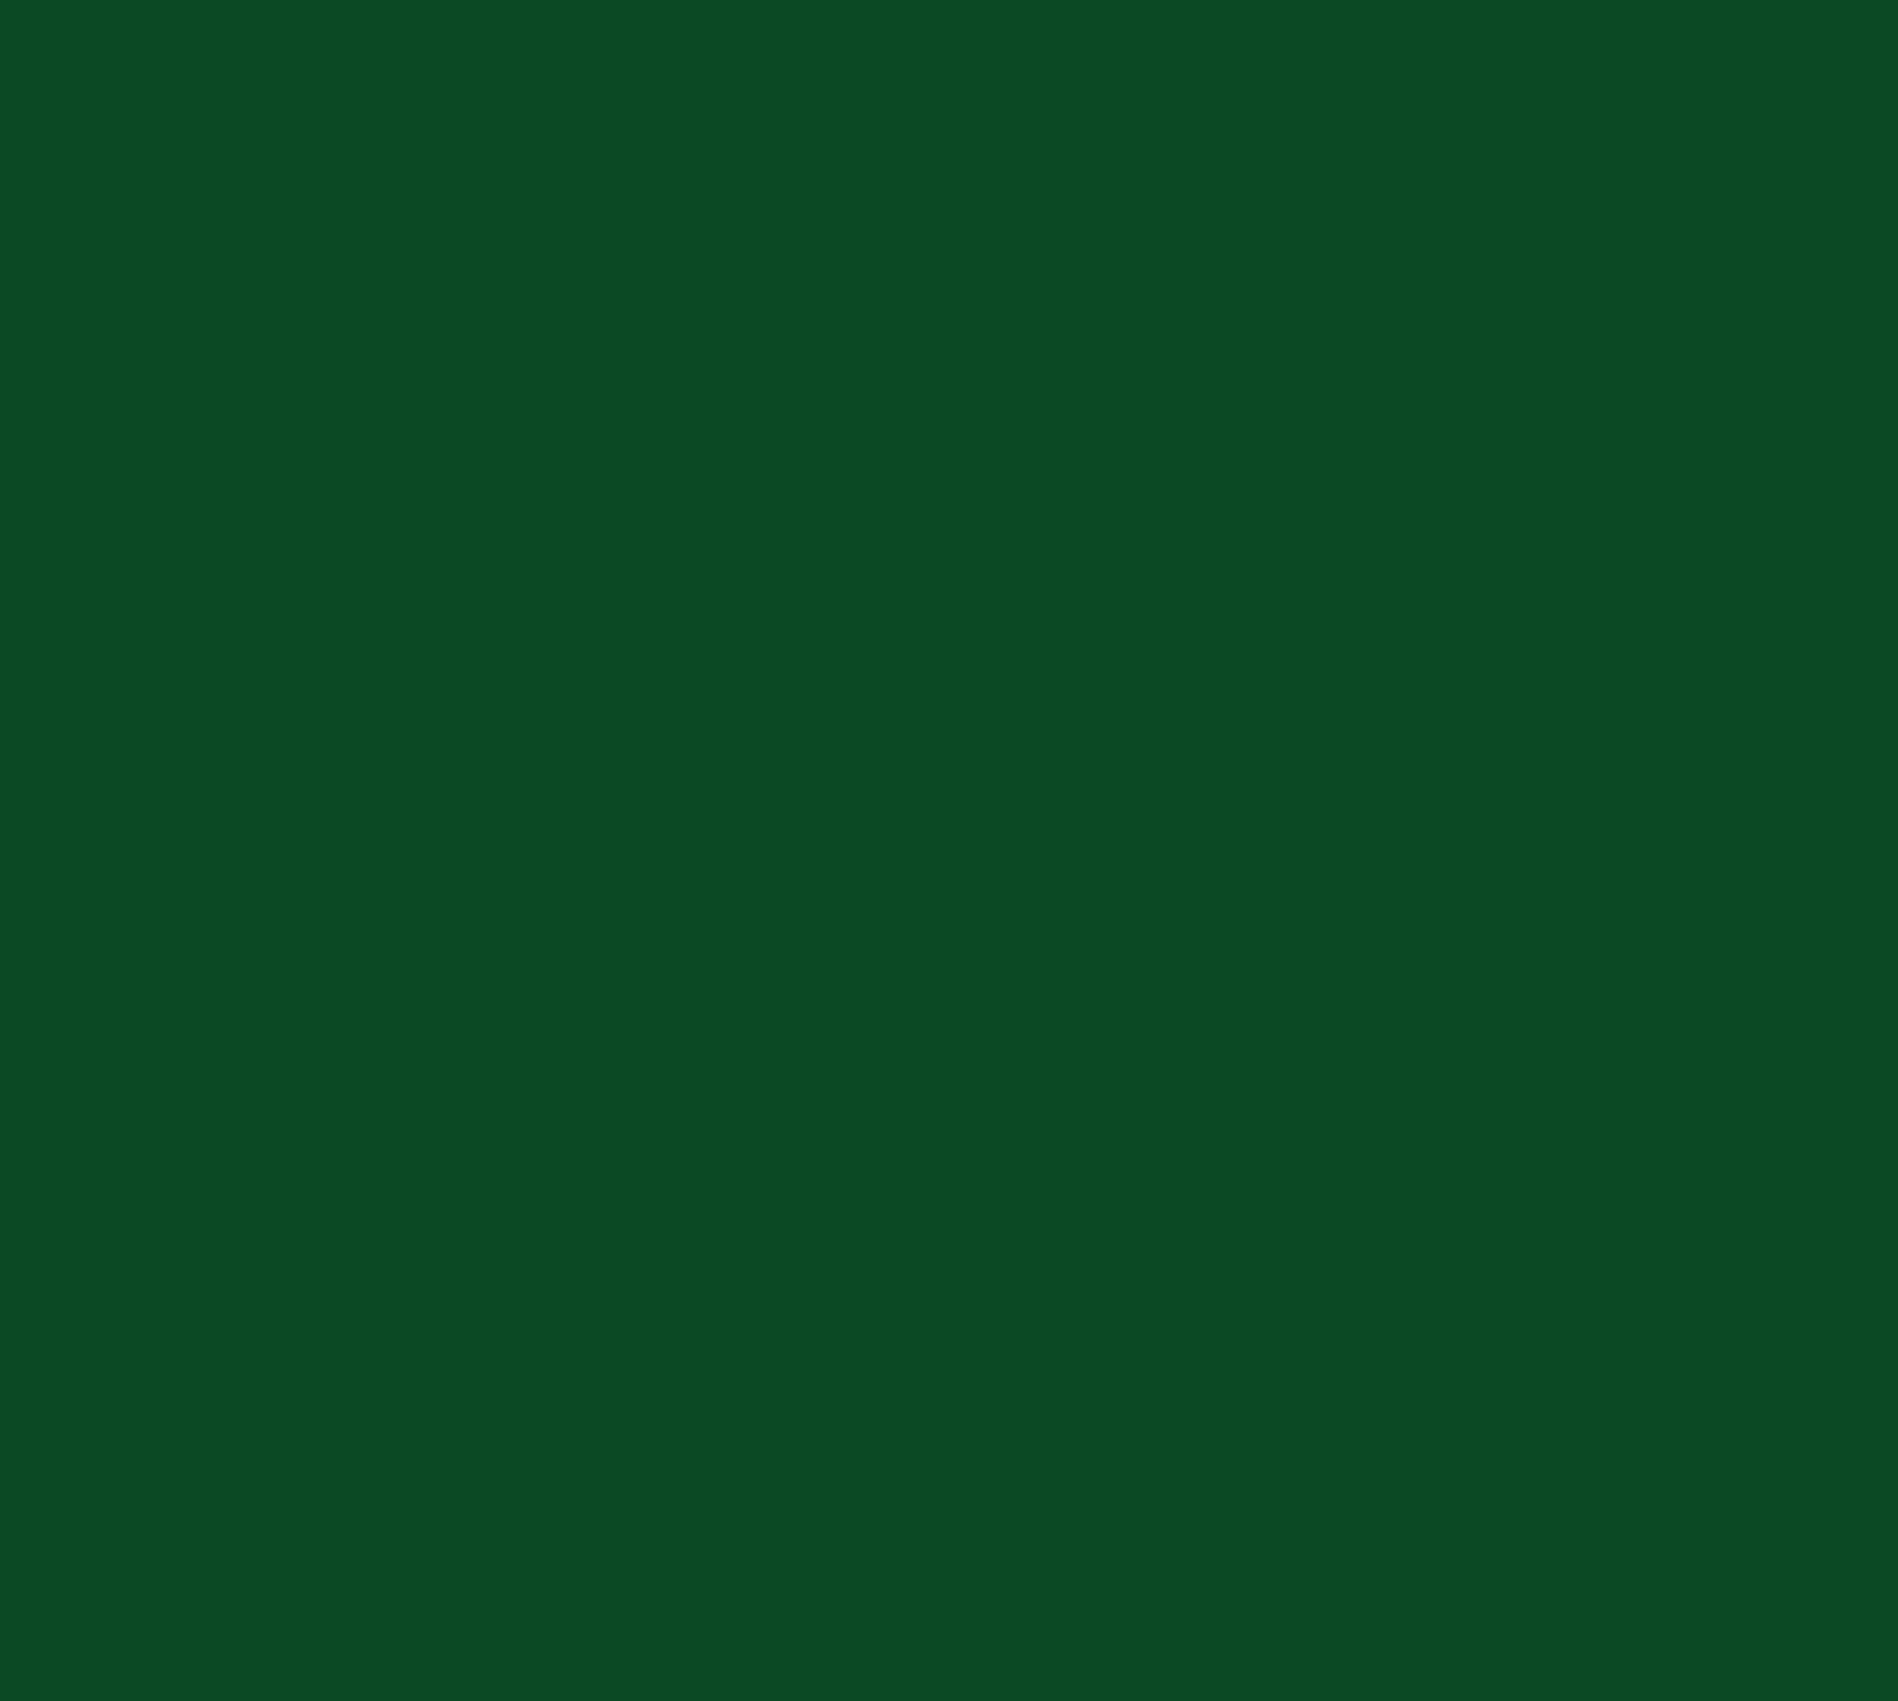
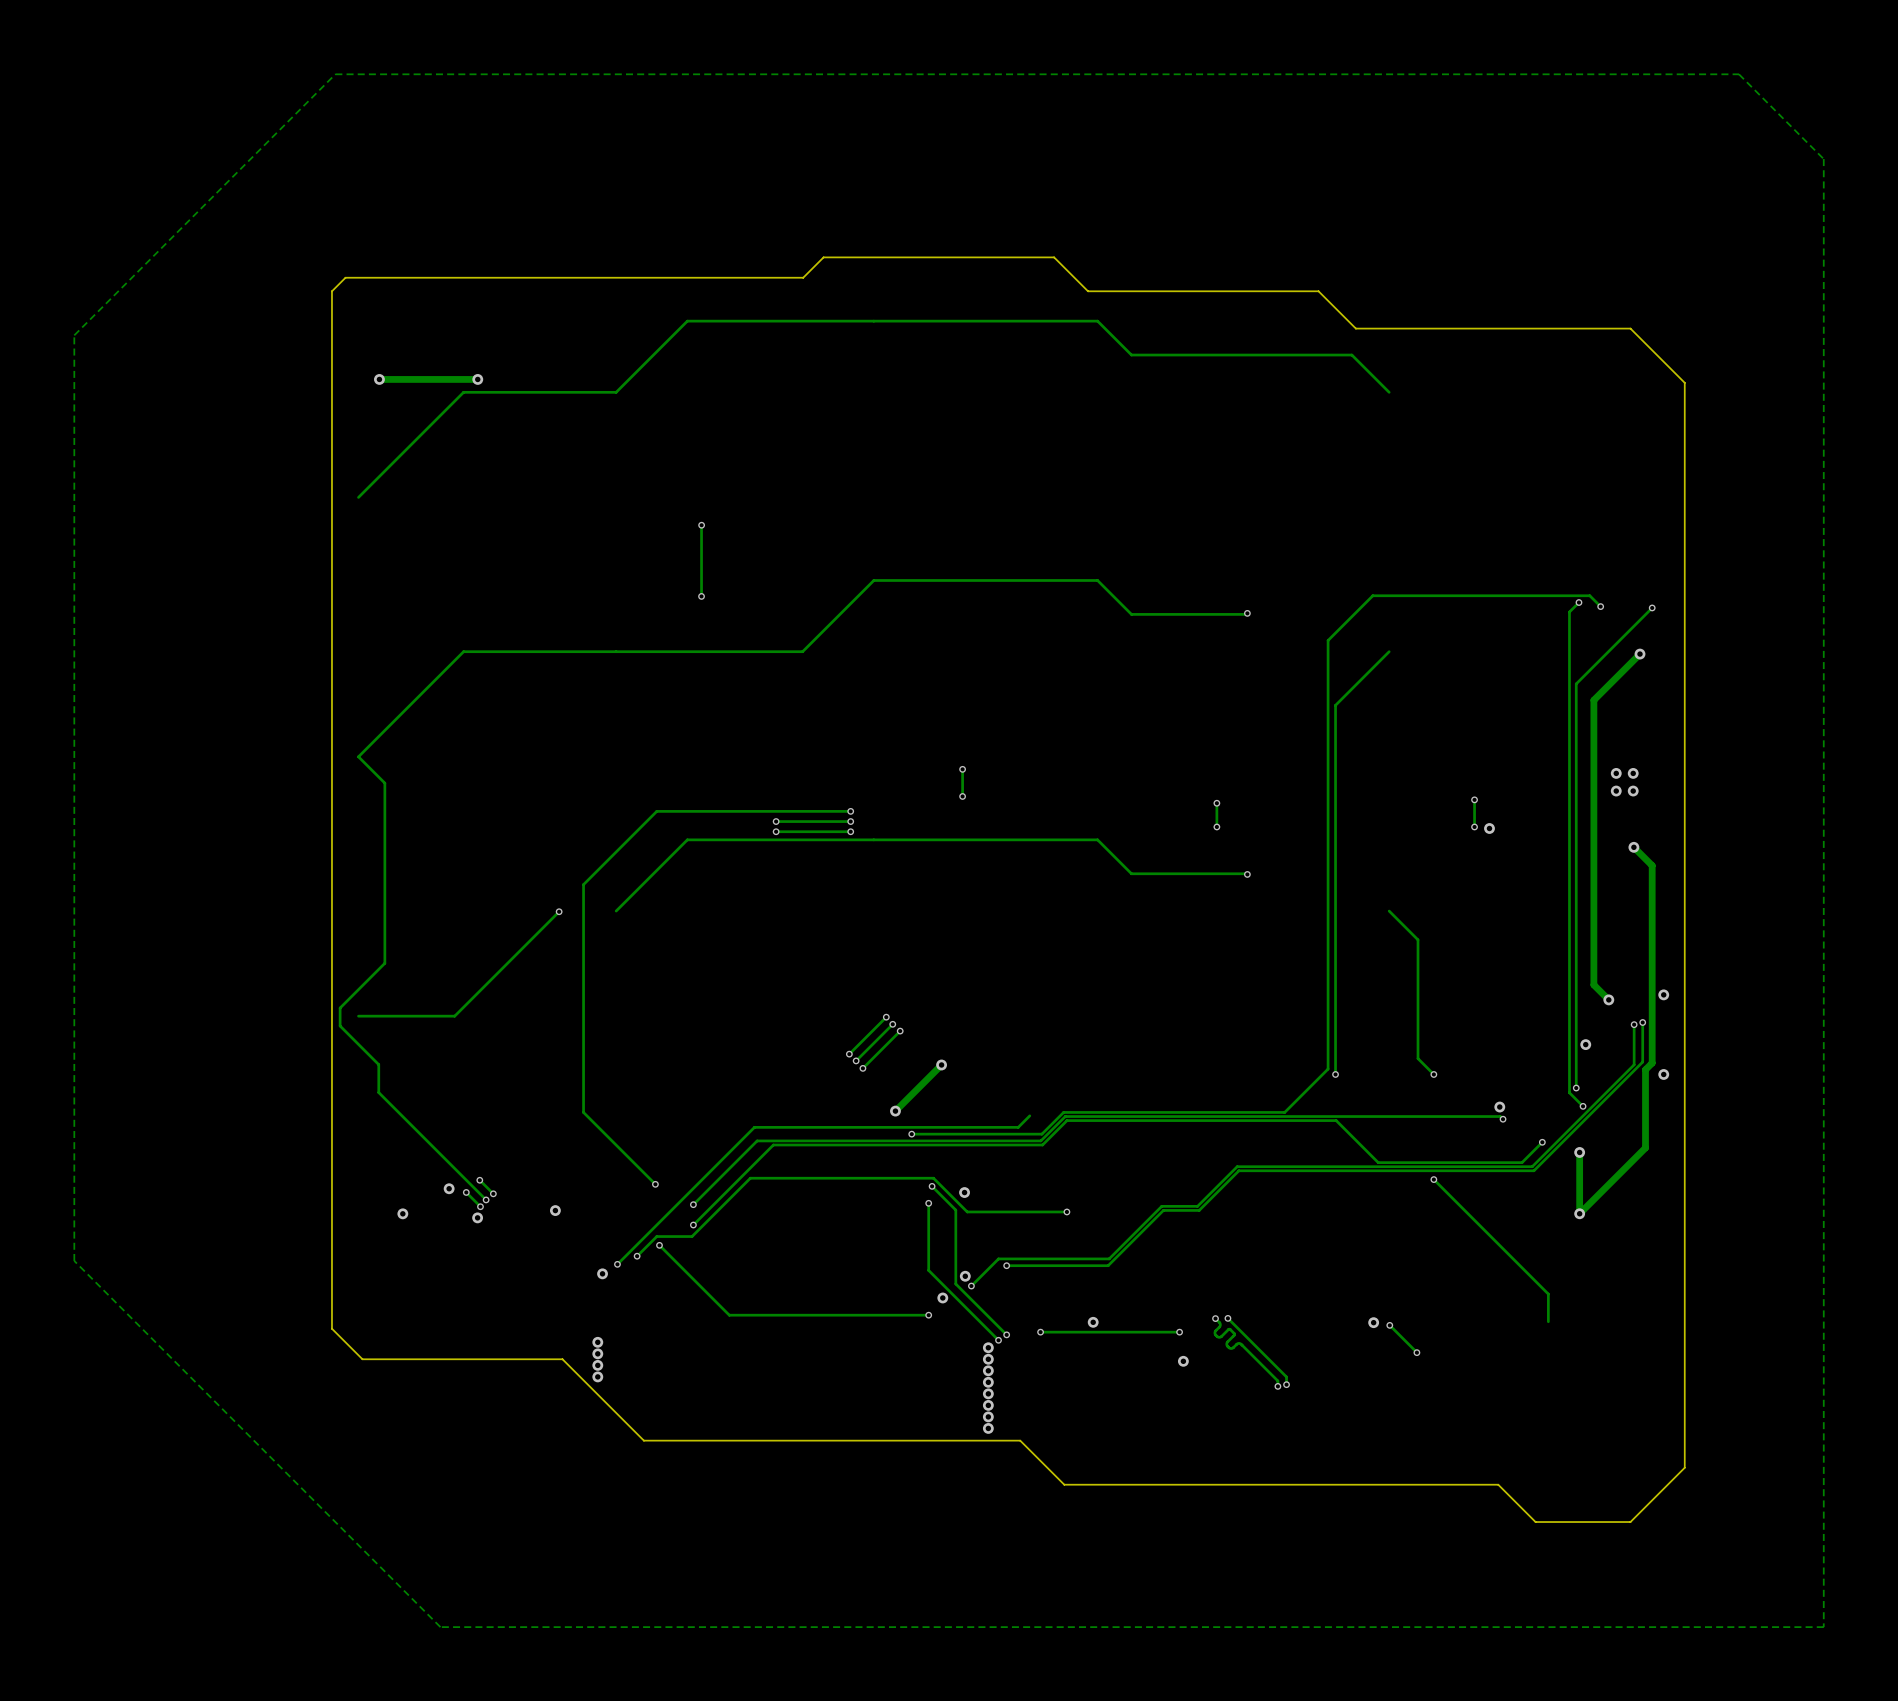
zone outline: none -> (1739, 74) (335, 74) (74, 335) (74, 1260) (440, 1627) (1823, 1627) (1823, 159) (1739, 74)
board edge: none -> (1054, 257) (1088, 291) (1318, 291) (1355, 328) (1630, 328) (1684, 382) (1684, 1467) (1630, 1522) (1535, 1522) (1498, 1484) (1064, 1484) (1020, 1440) (643, 1440) (562, 1359) (362, 1359) (331, 1328) (331, 291) (345, 277) (803, 277) (823, 257) (1054, 257)
via: none -> (379, 379)
track: none -> (477, 379) (379, 379)
via: none -> (477, 379)
track: none -> (1389, 392) (1351, 355) (1131, 355) (1097, 321) (687, 321) (616, 392) (463, 392) (358, 497)
track: none -> (701, 525) (701, 596)
via: none -> (701, 525)
via: none -> (701, 596)
track: none -> (1578, 602) (1569, 612) (1569, 1092) (1583, 1106)
via: none -> (1578, 602)
track: none -> (1600, 606) (1589, 595) (1372, 595) (1328, 640) (1328, 1069) (1284, 1112) (1063, 1112) (1041, 1134) (911, 1134)
via: none -> (1600, 606)
track: none -> (1652, 607) (1576, 683) (1576, 1088)
via: none -> (1652, 607)
track: none -> (1247, 613) (1131, 614) (1097, 580) (873, 580) (802, 651) (463, 651) (358, 756) (384, 783) (384, 963) (340, 1008) (340, 1025) (378, 1064) (378, 1092) (486, 1199)
via: none -> (1247, 613)
track: none -> (1389, 651) (1335, 705) (1335, 1074)
track: none -> (1640, 654) (1593, 700) (1593, 984) (1608, 999)
via: none -> (1640, 654)
track: none -> (962, 769) (962, 796)
via: none -> (962, 769)
via: none -> (1616, 773)
via: none -> (1633, 773)
via: none -> (1616, 791)
via: none -> (1633, 791)
via: none -> (962, 796)
track: none -> (1474, 799) (1474, 826)
via: none -> (1474, 799)
track: none -> (1216, 803) (1216, 826)
via: none -> (1216, 803)
track: none -> (850, 811) (656, 811) (583, 884) (583, 1112) (655, 1184)
via: none -> (850, 811)
via: none -> (776, 821)
track: none -> (850, 821) (776, 821)
via: none -> (850, 821)
via: none -> (1216, 826)
via: none -> (1474, 826)
via: none -> (1489, 828)
via: none -> (776, 831)
track: none -> (850, 831) (776, 831)
via: none -> (850, 831)
track: none -> (1633, 847) (1652, 865) (1652, 1063) (1645, 1069) (1645, 1147) (1579, 1213) (1579, 1152)
via: none -> (1633, 847)
track: none -> (1247, 874) (1131, 873) (1097, 839) (687, 839) (616, 911)
via: none -> (1247, 874)
track: none -> (559, 911) (454, 1016) (358, 1016)
via: none -> (559, 911)
track: none -> (1389, 911) (1418, 939) (1418, 1058) (1433, 1074)
via: none -> (1663, 994)
via: none -> (1608, 999)
track: none -> (886, 1017) (849, 1054)
via: none -> (886, 1017)
track: none -> (1642, 1022) (1642, 1062) (1533, 1170) (1238, 1170) (1199, 1210) (1163, 1210) (1108, 1265) (1006, 1265)
via: none -> (1642, 1022)
track: none -> (892, 1024) (856, 1060)
via: none -> (892, 1024)
track: none -> (1634, 1024) (1634, 1064) (1532, 1166) (1237, 1166) (1197, 1206) (1161, 1206) (1109, 1258) (998, 1258) (971, 1286)
via: none -> (1634, 1024)
track: none -> (900, 1031) (862, 1068)
via: none -> (900, 1031)
via: none -> (1585, 1044)
via: none -> (849, 1054)
via: none -> (856, 1060)
track: none -> (941, 1064) (895, 1111)
via: none -> (941, 1064)
via: none -> (862, 1068)
via: none -> (1335, 1074)
via: none -> (1433, 1074)
via: none -> (1663, 1074)
via: none -> (1576, 1088)
via: none -> (1583, 1106)
via: none -> (1499, 1107)
via: none -> (895, 1111)
track: none -> (1029, 1115) (1018, 1127) (754, 1127) (617, 1264)
track: none -> (1503, 1119) (1500, 1116) (1065, 1116) (1040, 1140) (757, 1140) (693, 1204)
via: none -> (1503, 1119)
via: none -> (911, 1134)
track: none -> (1542, 1142) (1522, 1162) (1378, 1162) (1336, 1120) (1067, 1120) (1042, 1145) (773, 1145) (693, 1225)
via: none -> (1542, 1142)
via: none -> (1579, 1152)
track: none -> (1433, 1179) (1548, 1294) (1548, 1321)
via: none -> (1433, 1179)
track: none -> (479, 1180) (493, 1193)
via: none -> (479, 1180)
via: none -> (655, 1184)
track: none -> (932, 1186) (955, 1210) (955, 1284) (1006, 1334)
via: none -> (932, 1186)
via: none -> (449, 1188)
track: none -> (466, 1192) (480, 1206)
via: none -> (466, 1192)
via: none -> (964, 1192)
via: none -> (493, 1193)
via: none -> (486, 1199)
track: none -> (928, 1203) (928, 1270) (998, 1340)
via: none -> (928, 1203)
via: none -> (693, 1204)
via: none -> (480, 1206)
via: none -> (555, 1210)
track: none -> (1066, 1211) (967, 1211) (933, 1178) (750, 1178) (692, 1236) (656, 1236) (637, 1256)
via: none -> (1066, 1211)
via: none -> (402, 1213)
via: none -> (1579, 1213)
via: none -> (477, 1217)
via: none -> (693, 1225)
track: none -> (659, 1245) (729, 1315) (928, 1315)
via: none -> (659, 1245)
via: none -> (637, 1256)
via: none -> (617, 1264)
via: none -> (1006, 1265)
via: none -> (602, 1273)
via: none -> (965, 1276)
via: none -> (971, 1286)
via: none -> (942, 1297)
via: none -> (928, 1315)
track: none -> (1215, 1318) (1220, 1324) (1215, 1331) (1215, 1335) (1220, 1337) (1230, 1329) (1234, 1334) (1227, 1342) (1227, 1346) (1231, 1348) (1237, 1343) (1240, 1344) (1277, 1380) (1277, 1386)
via: none -> (1215, 1318)
track: none -> (1227, 1318) (1286, 1377) (1286, 1384)
via: none -> (1227, 1318)
via: none -> (1093, 1322)
via: none -> (1373, 1322)
track: none -> (1389, 1325) (1416, 1352)
via: none -> (1389, 1325)
via: none -> (1040, 1332)
track: none -> (1179, 1332) (1040, 1332)
via: none -> (1179, 1332)
via: none -> (1006, 1334)
via: none -> (998, 1340)
via: none -> (597, 1342)
via: none -> (988, 1347)
via: none -> (1416, 1352)
via: none -> (597, 1353)
via: none -> (988, 1359)
via: none -> (1183, 1361)
via: none -> (597, 1365)
via: none -> (988, 1370)
via: none -> (597, 1376)
via: none -> (988, 1382)
via: none -> (1286, 1384)
via: none -> (1277, 1386)
via: none -> (988, 1393)
via: none -> (988, 1405)
via: none -> (988, 1416)
via: none -> (988, 1428)

